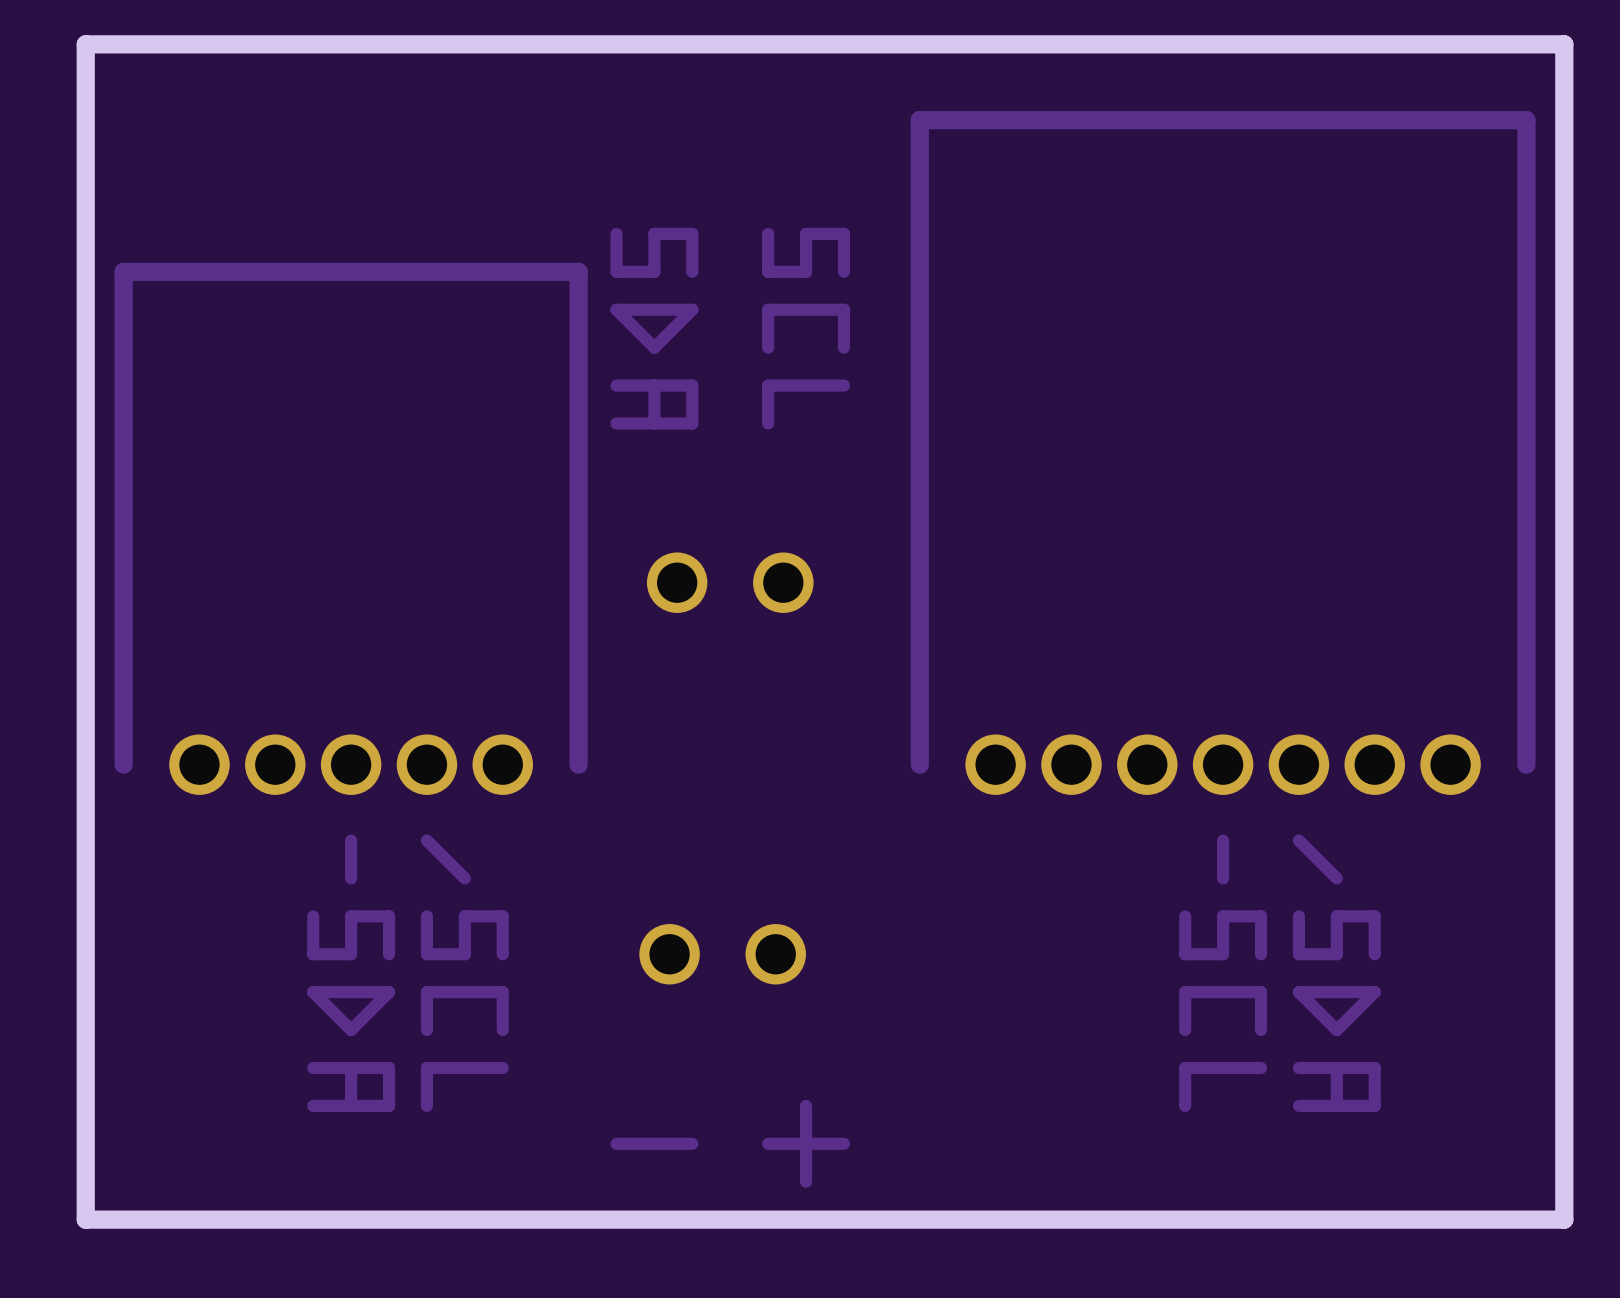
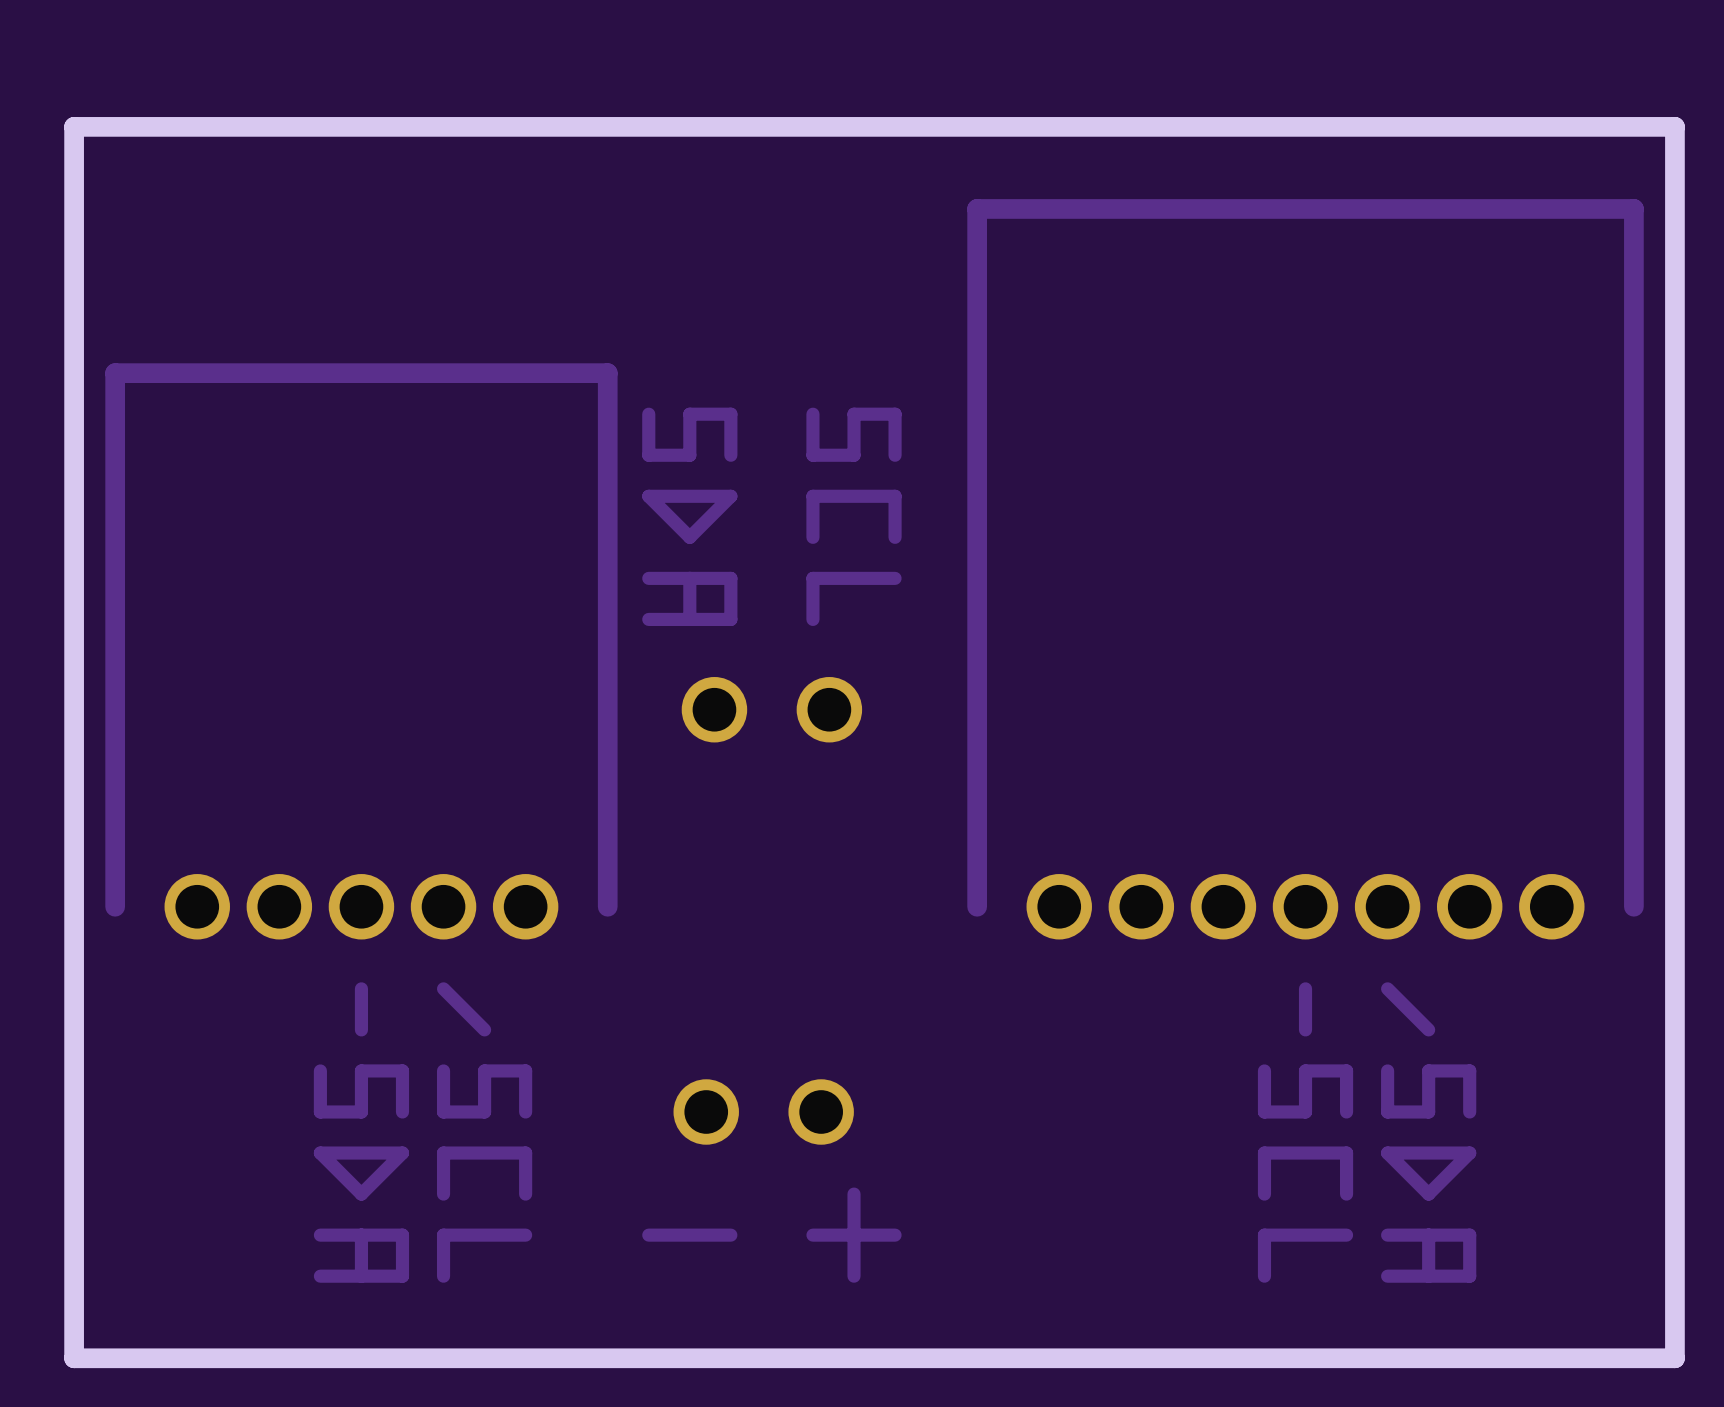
board edge: (85, 82) (85, 44) (1564, 44) (1564, 82) -> (74, 126) (1674, 126)
track: (919, 158) (919, 120) (1526, 120) (1526, 158) -> (977, 208) (1633, 208)
track: (616, 233) (616, 271) (654, 271) (654, 233) (692, 233) (692, 271) -> none
track: (768, 233) (768, 271) (806, 271) (806, 233) (843, 233) (843, 271) -> none
track: (123, 309) (123, 271) (578, 271) (578, 309) -> (115, 373) (607, 373)
track: (616, 309) (654, 347) (692, 309) (616, 309) -> none
track: none -> (648, 414) (648, 455)
track: (768, 347) (768, 309) (843, 309) (843, 347) -> (812, 537) (812, 496) (895, 496) (895, 537)
track: none -> (689, 455) (689, 414) (730, 414) (730, 455)
track: (768, 385) (768, 423) -> (812, 455) (812, 414)
track: (806, 385) (843, 385) -> (854, 455) (854, 414) (895, 414) (895, 455)
track: (654, 423) (654, 385) (692, 385) (692, 423) -> (648, 496) (689, 537) (730, 496)
track: none -> (648, 578) (730, 578) (730, 619) (648, 619)
track: none -> (689, 578) (689, 619)
track: none -> (895, 578) (812, 578) (812, 619)
via position: (677, 582) -> (714, 709)
via position: (783, 582) -> (829, 709)
track: none -> (115, 865) (115, 906)
via position: (199, 764) -> (197, 906)
via position: (275, 764) -> (279, 906)
via position: (351, 764) -> (361, 906)
via position: (426, 764) -> (443, 906)
via position: (502, 764) -> (525, 906)
track: none -> (607, 865) (607, 906)
track: none -> (977, 865) (977, 906)
via position: (995, 764) -> (1059, 906)
via position: (1071, 764) -> (1141, 906)
via position: (1147, 764) -> (1223, 906)
via position: (1223, 764) -> (1305, 906)
via position: (1298, 764) -> (1387, 906)
via position: (1374, 764) -> (1469, 906)
via position: (1450, 764) -> (1551, 906)
track: none -> (1633, 865) (1633, 906)
track: (351, 840) (351, 878) -> (361, 1029) (361, 988)
track: (426, 840) (464, 878) -> (443, 988) (484, 1029)
track: (1223, 840) (1223, 878) -> (1305, 1029) (1305, 988)
track: (1298, 840) (1336, 878) -> (1387, 988) (1428, 1029)
track: (313, 916) (313, 954) (351, 954) (351, 916) (389, 916) (389, 954) -> none
track: (426, 916) (426, 954) (464, 954) (464, 916) (502, 916) (502, 954) -> none
track: (1185, 916) (1185, 954) (1223, 954) (1223, 916) (1261, 916) (1261, 954) -> none
track: (1298, 916) (1298, 954) (1336, 954) (1336, 916) (1374, 916) (1374, 954) -> none
via position: (669, 954) -> (706, 1111)
via position: (775, 954) -> (821, 1111)
track: (313, 992) (351, 1030) (389, 992) (351, 992) -> (320, 1111) (320, 1070)
track: none -> (361, 1111) (361, 1070) (402, 1070) (402, 1111)
track: (426, 992) (426, 1030) -> (443, 1111) (443, 1070)
track: (464, 992) (502, 992) (502, 1030) -> (484, 1111) (484, 1070) (525, 1070) (525, 1111)
track: (1185, 992) (1185, 1030) -> (1264, 1111) (1264, 1070)
track: (1223, 992) (1261, 992) (1261, 1030) -> (1305, 1111) (1305, 1070) (1346, 1070) (1346, 1111)
track: (1298, 992) (1336, 1030) (1374, 992) (1336, 992) -> (1387, 1111) (1387, 1070)
track: none -> (1428, 1111) (1428, 1070) (1469, 1070) (1469, 1111)
track: none -> (320, 1153) (361, 1194) (402, 1153) (320, 1153)
track: none -> (1387, 1153) (1469, 1153) (1428, 1194) (1387, 1153)
track: (313, 1067) (389, 1067) (389, 1105) -> (320, 1276) (402, 1276) (402, 1235)
track: (351, 1067) (351, 1105) -> (361, 1276) (361, 1235)
track: (502, 1067) (426, 1067) (426, 1105) -> (525, 1194) (525, 1153) (443, 1153) (443, 1194)
track: (1261, 1067) (1185, 1067) (1185, 1105) -> (1346, 1194) (1346, 1153) (1264, 1153) (1264, 1194)
track: (1298, 1067) (1374, 1067) (1374, 1105) -> (1387, 1276) (1469, 1276) (1469, 1235)
track: (1336, 1067) (1336, 1105) -> (1428, 1276) (1428, 1235)
track: none -> (525, 1235) (443, 1235) (443, 1276)
track: none -> (1346, 1235) (1264, 1235) (1264, 1276)
track: (616, 1143) (692, 1143) -> (648, 1235) (730, 1235)
track: (768, 1143) (843, 1143) -> (812, 1235) (895, 1235)
track: (806, 1143) (806, 1181) -> (854, 1194) (854, 1235)

